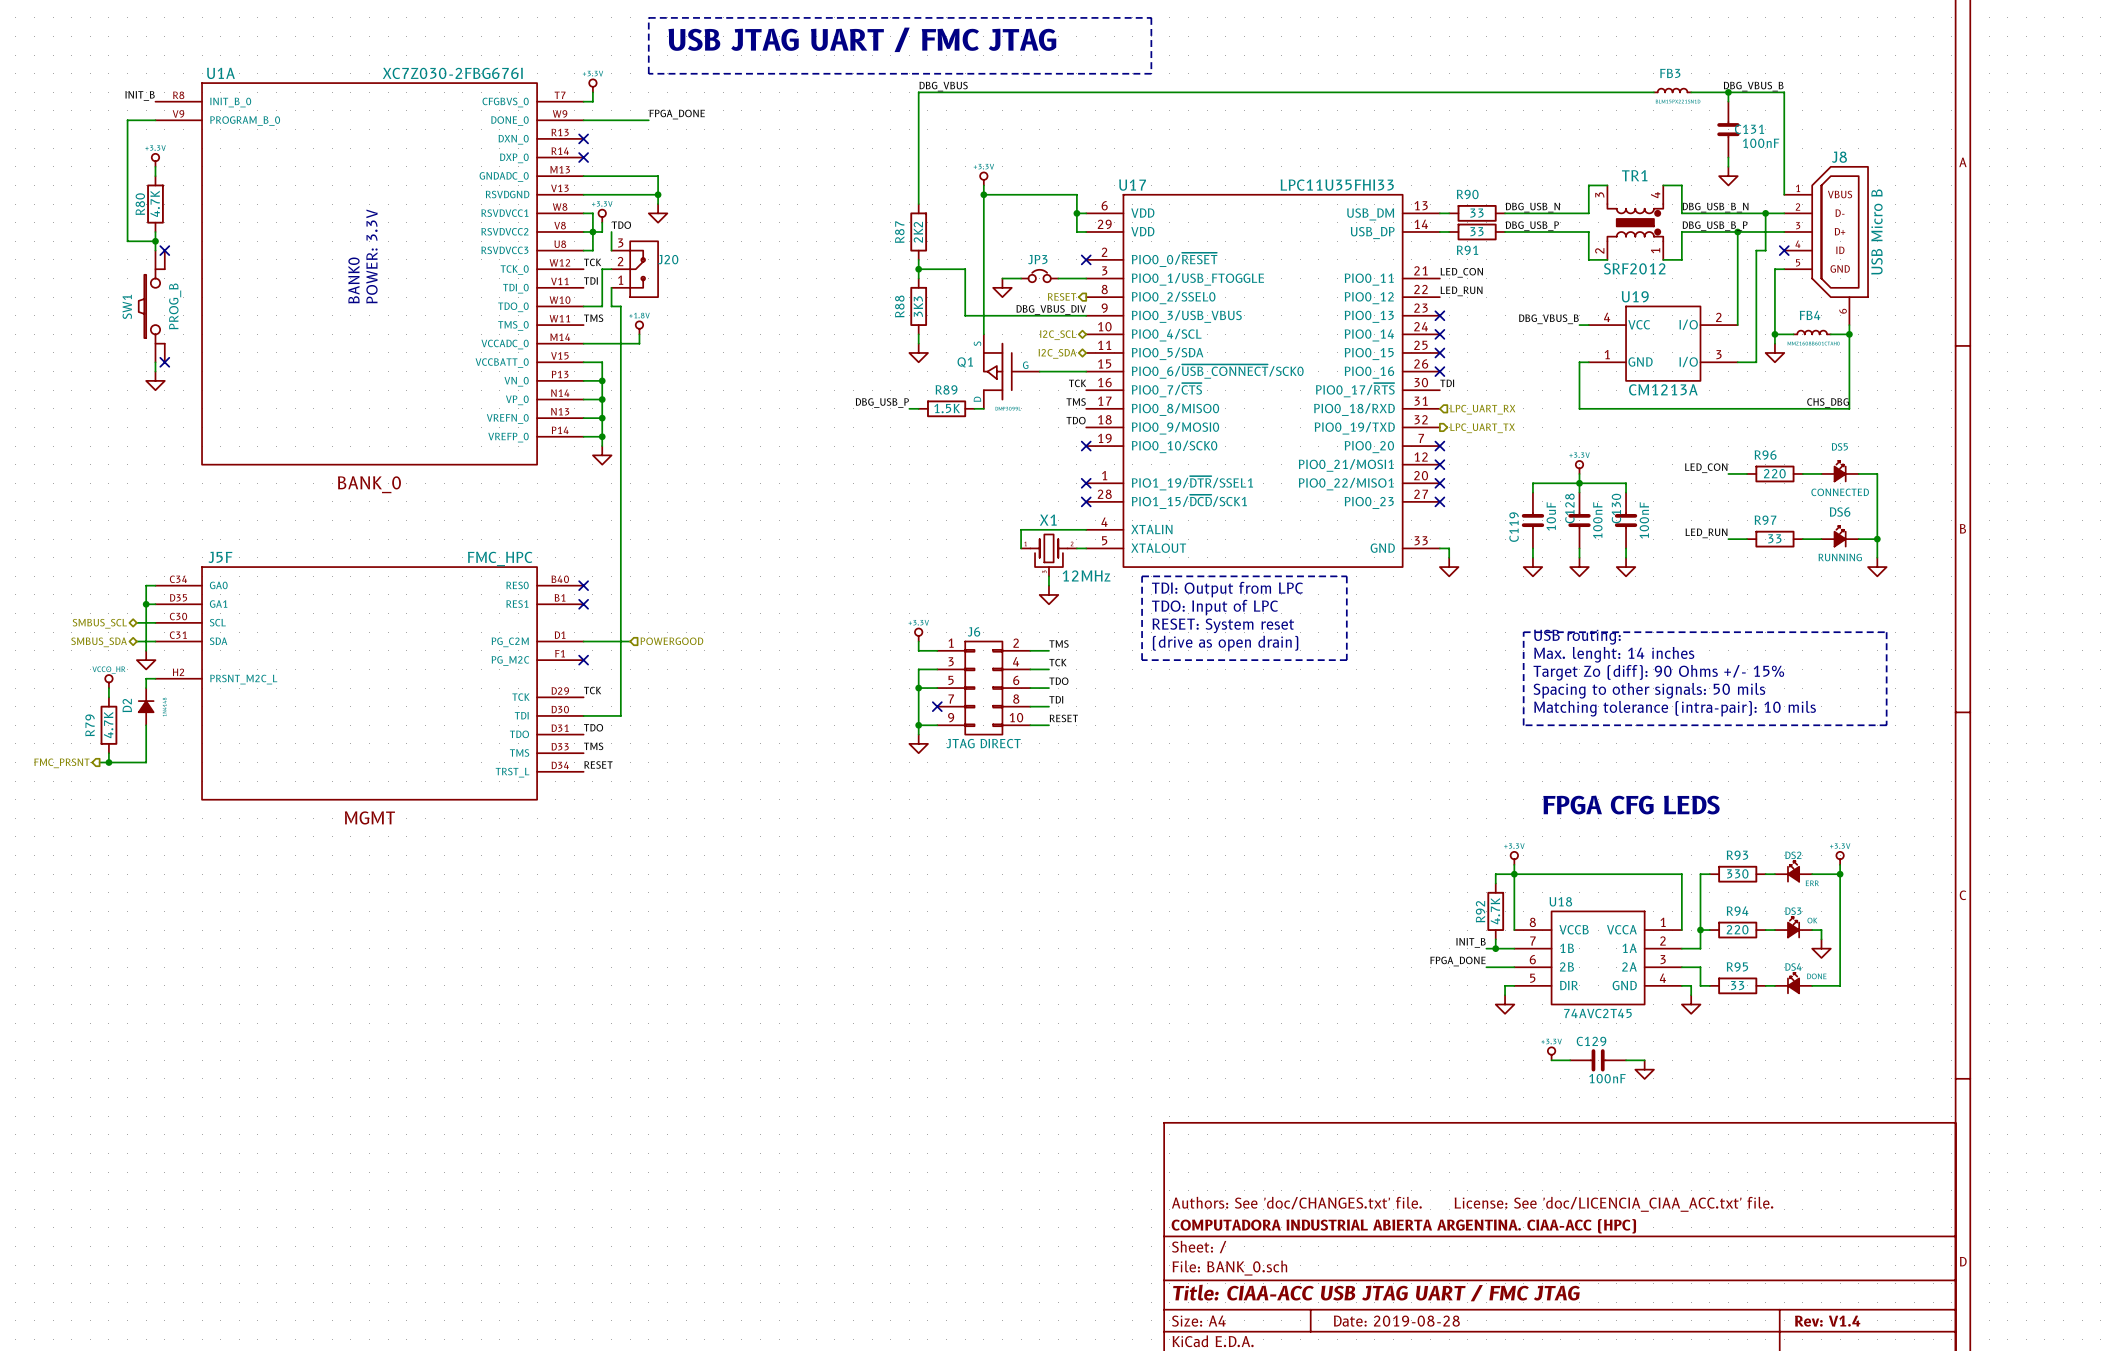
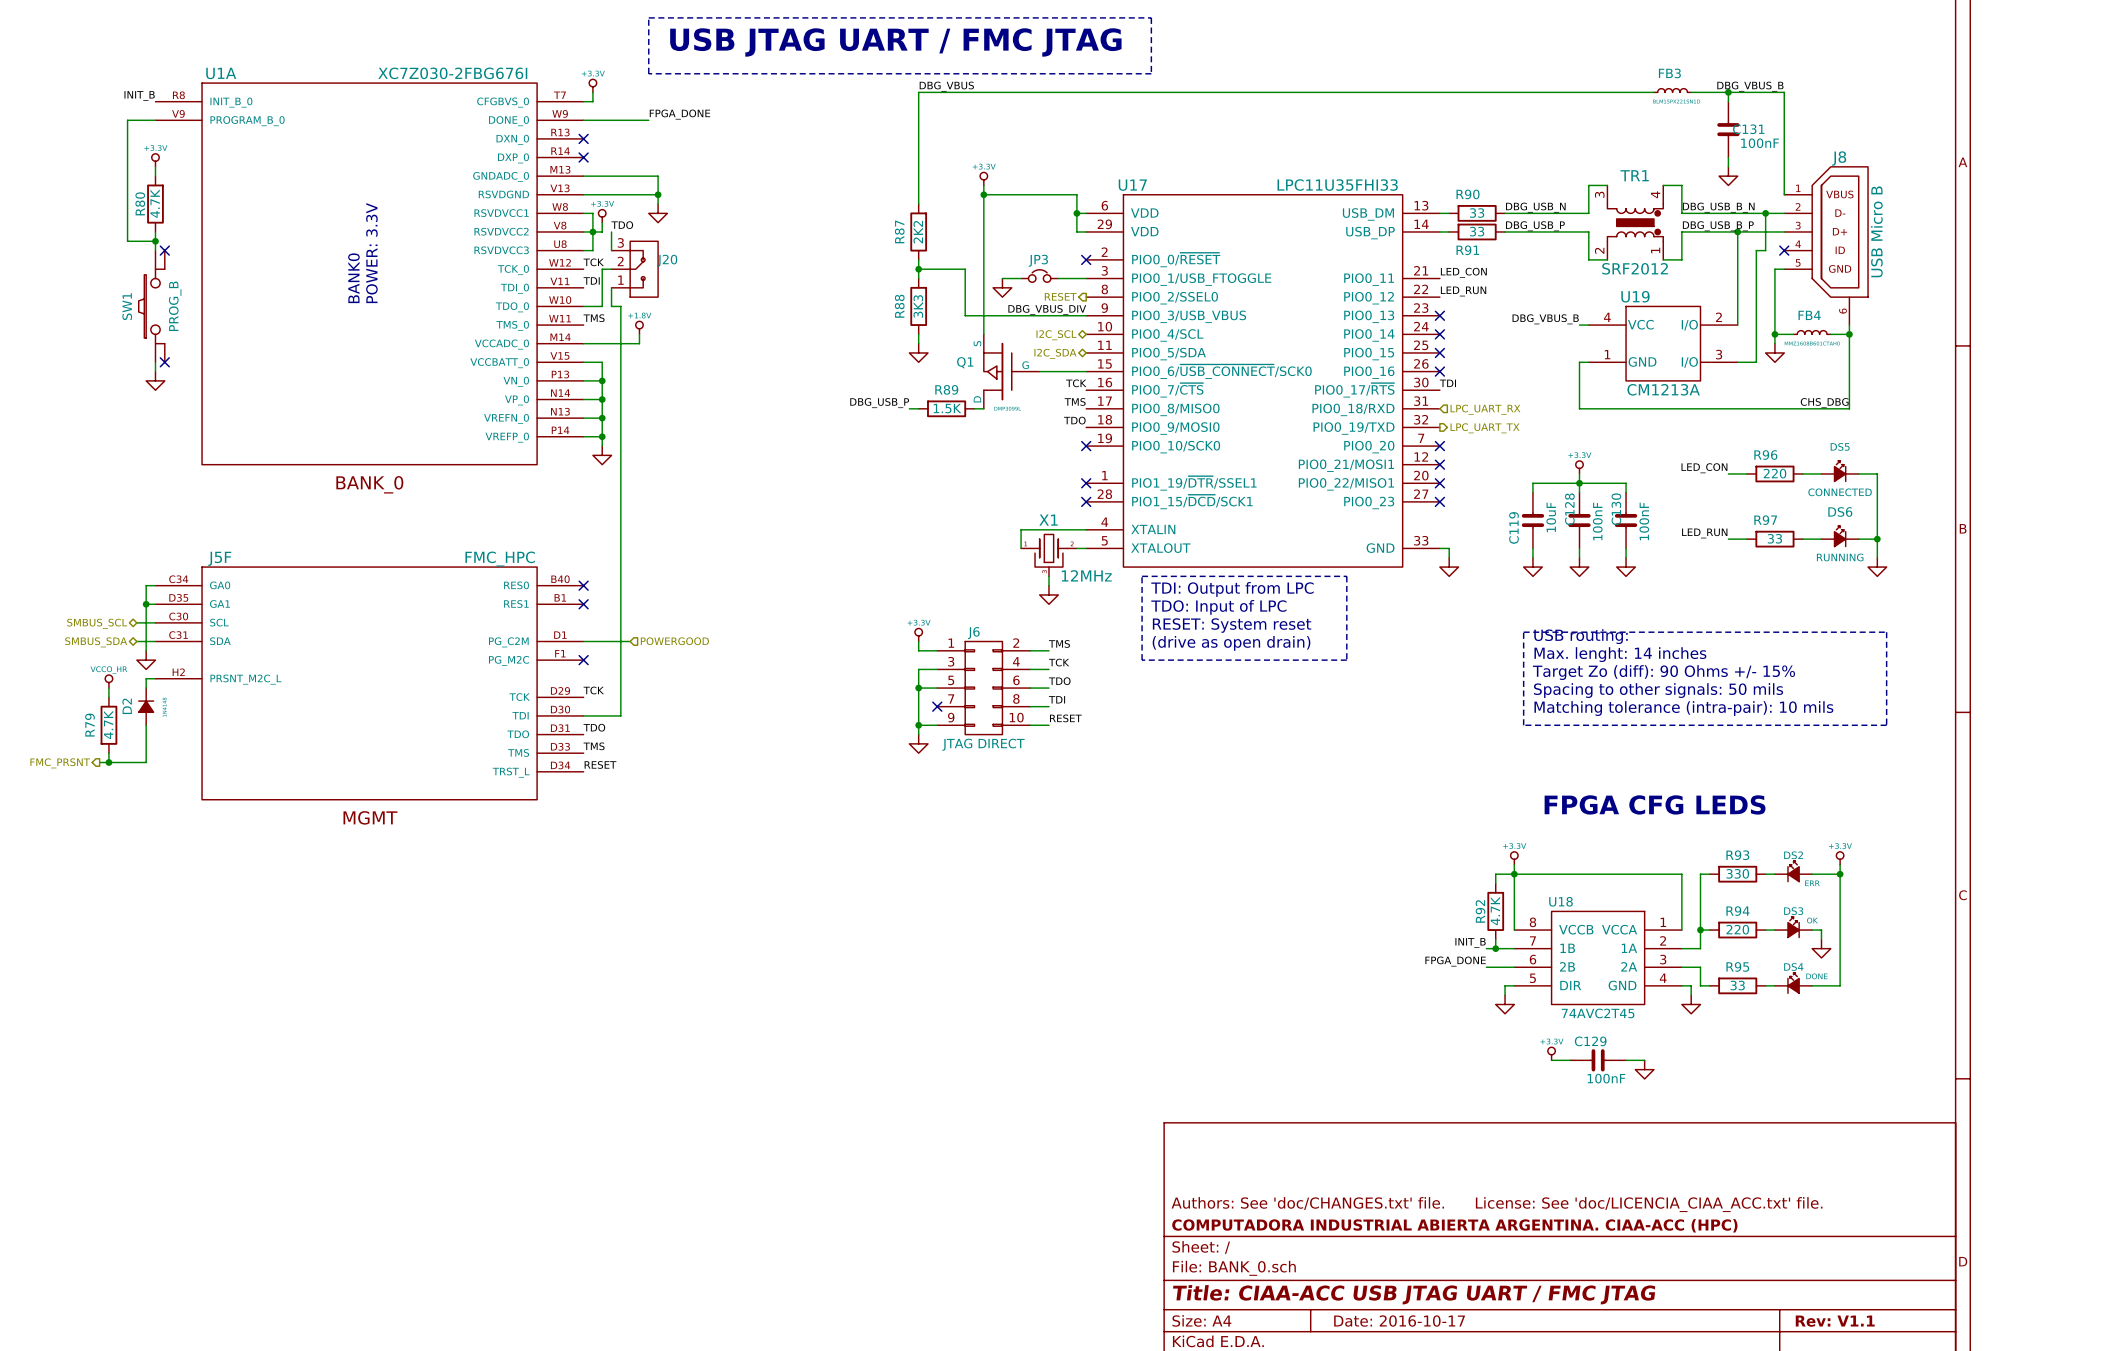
title block: Date: 2019-08-28 (1396, 1321) -> Date: 2016-10-17 (1399, 1321)
title block: Rev: V1.4 (1827, 1321) -> Rev: V1.1 (1835, 1321)

